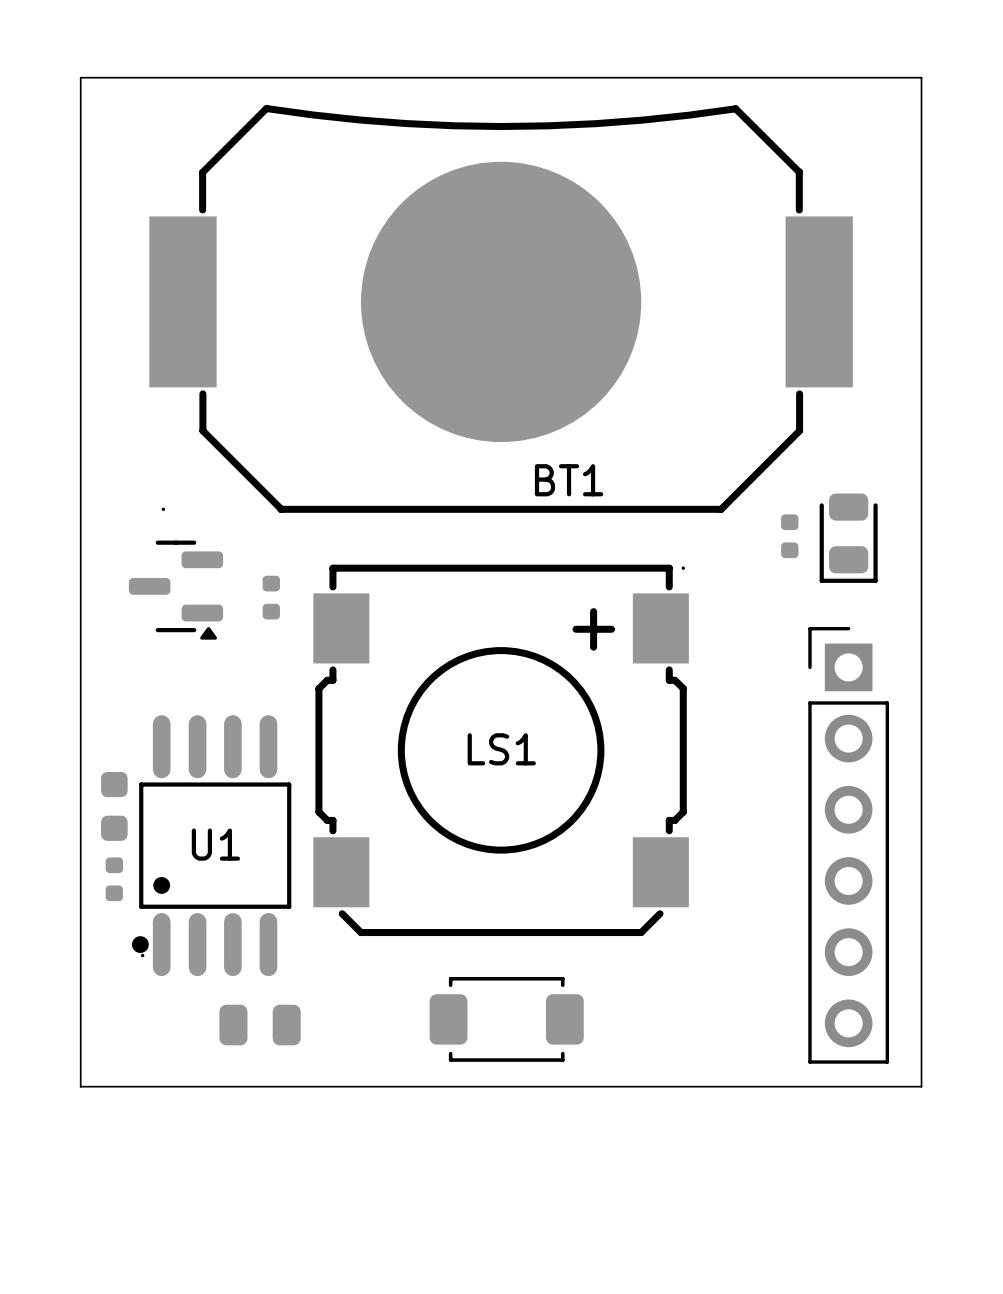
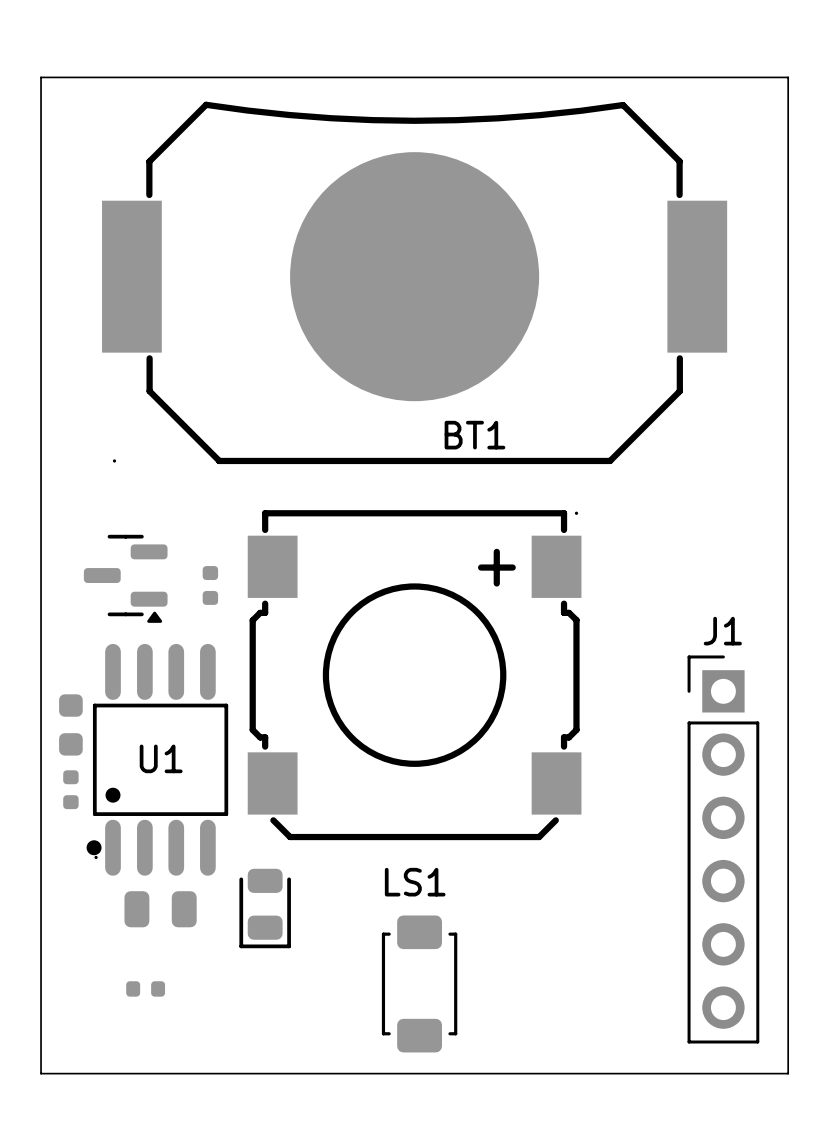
part: (789, 536) -> none
part: (848, 538) -> none
part position: (175, 590) -> (125, 578)
part position: (271, 597) -> (210, 585)
LS1 name position: LS1 (501, 749) -> LS1 (415, 882)
part: (848, 845) -> none
J1: none -> (723, 849)
part: none -> (265, 908)
part rotation: 0° (506, 1019) -> 90° clockwise (419, 983)
part position: (260, 1025) -> (160, 909)
board edge: (80, 1086) (921, 1086) -> (41, 974) (41, 1073) (788, 1073) (788, 974)
part: none -> (145, 988)

